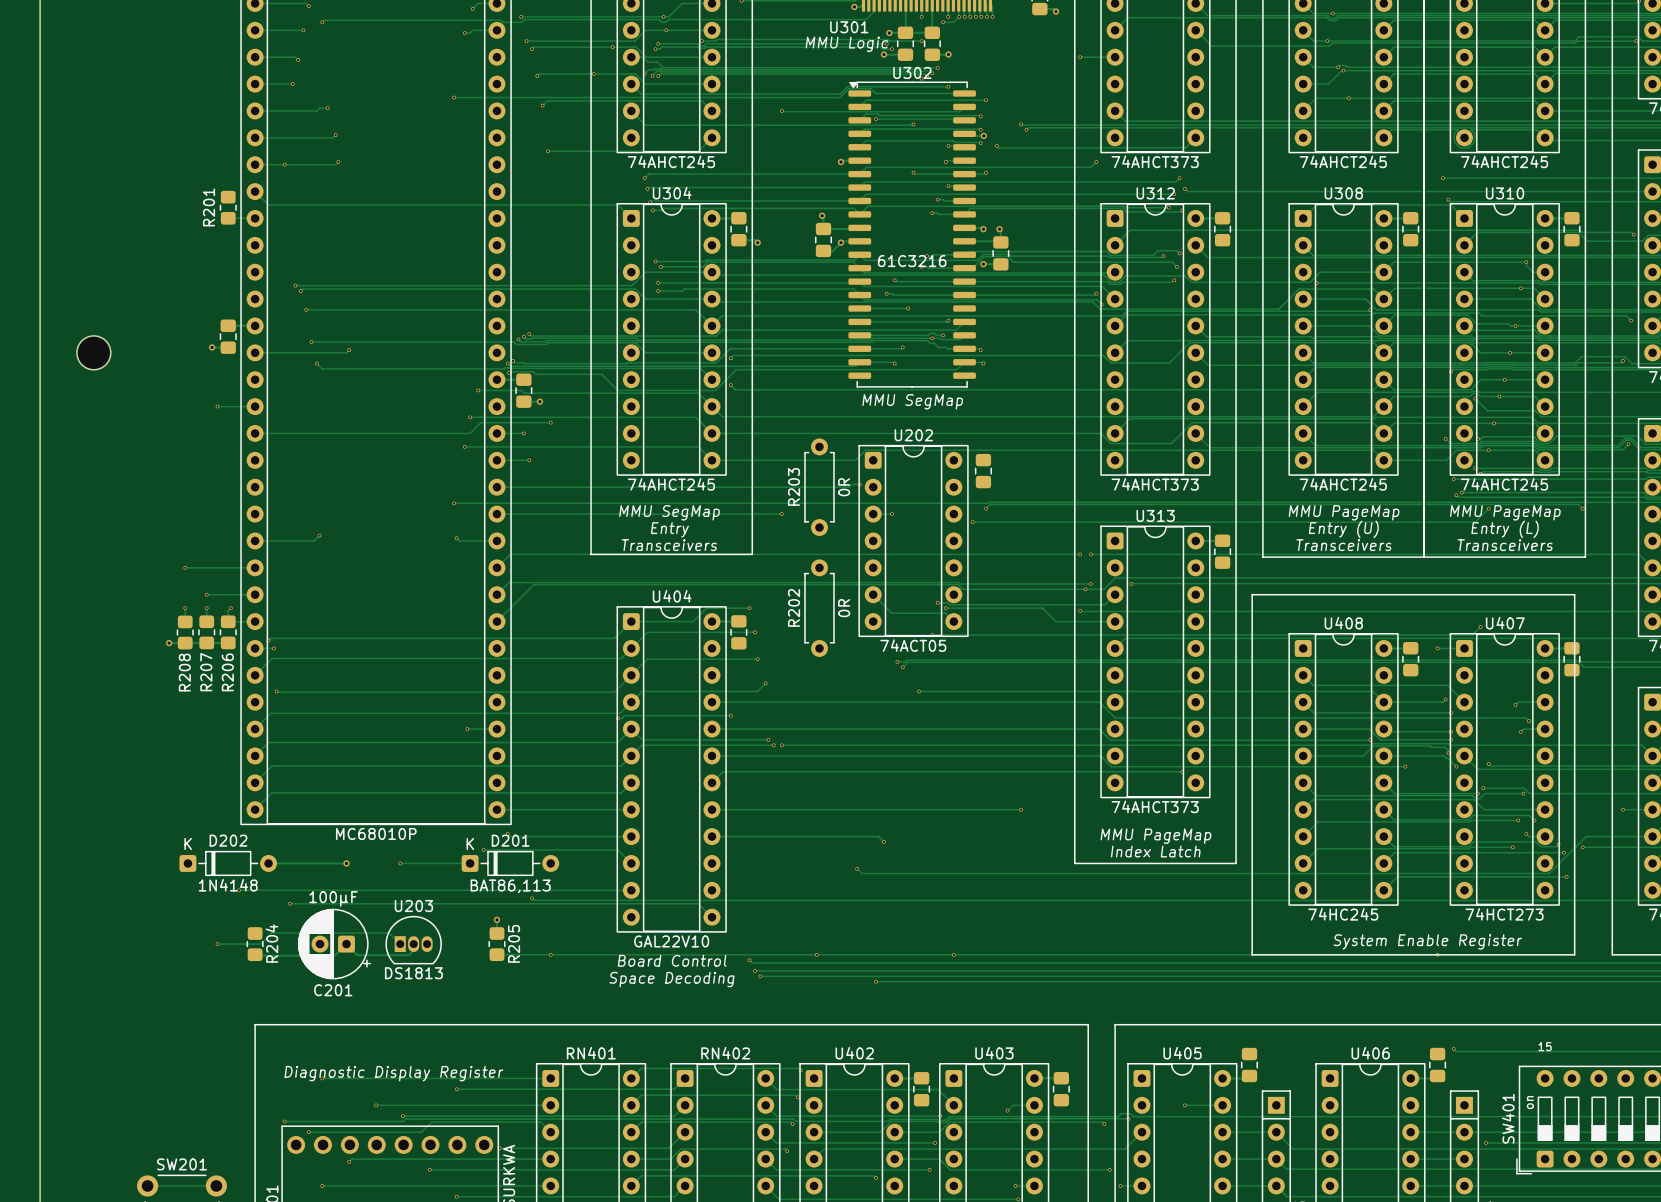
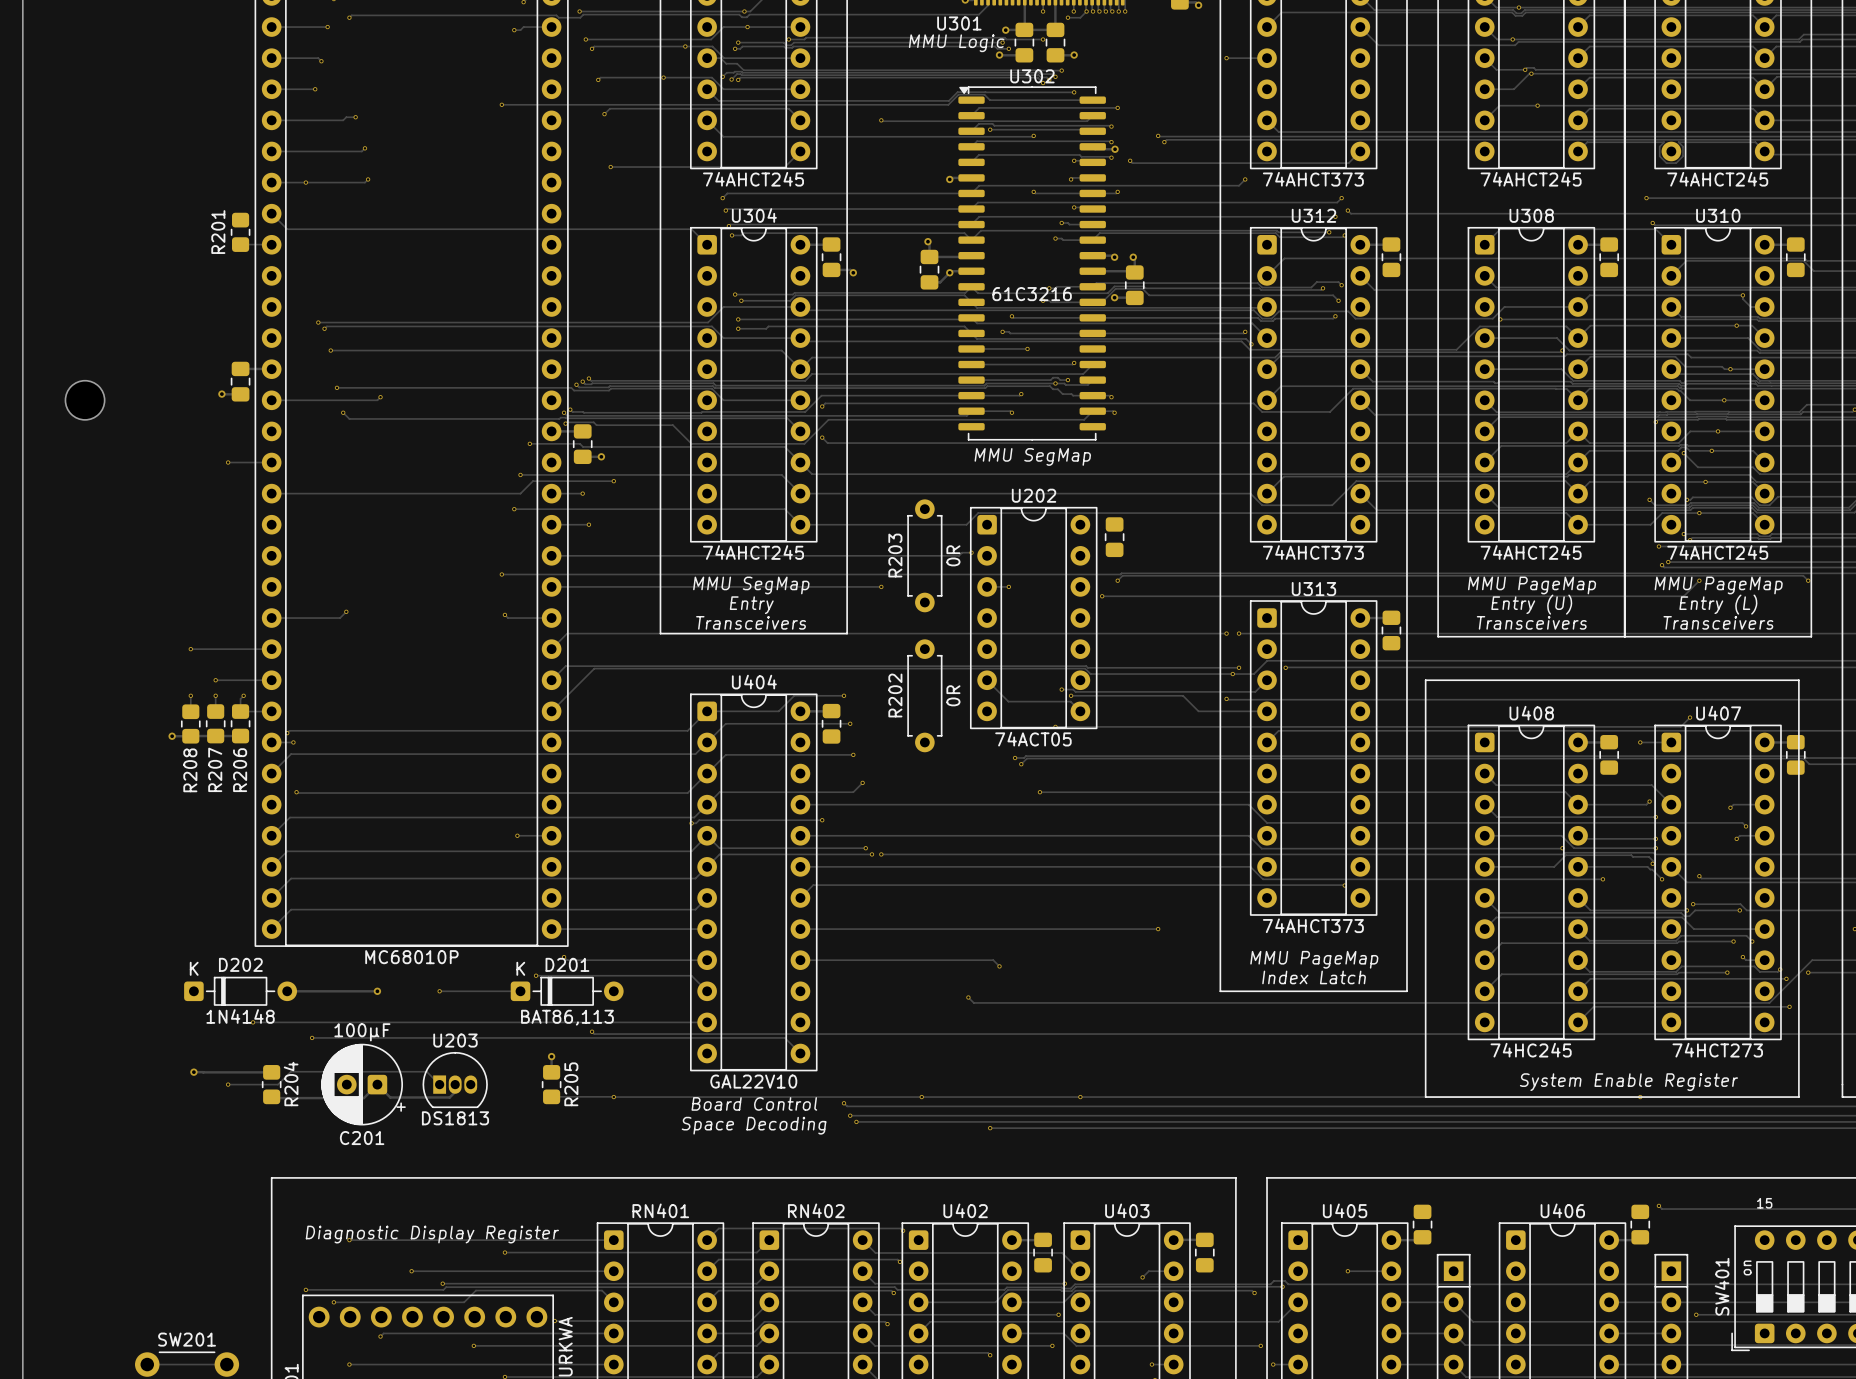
track: none -> (193, 1072) (271, 1072)
via: none -> (193, 1072)

